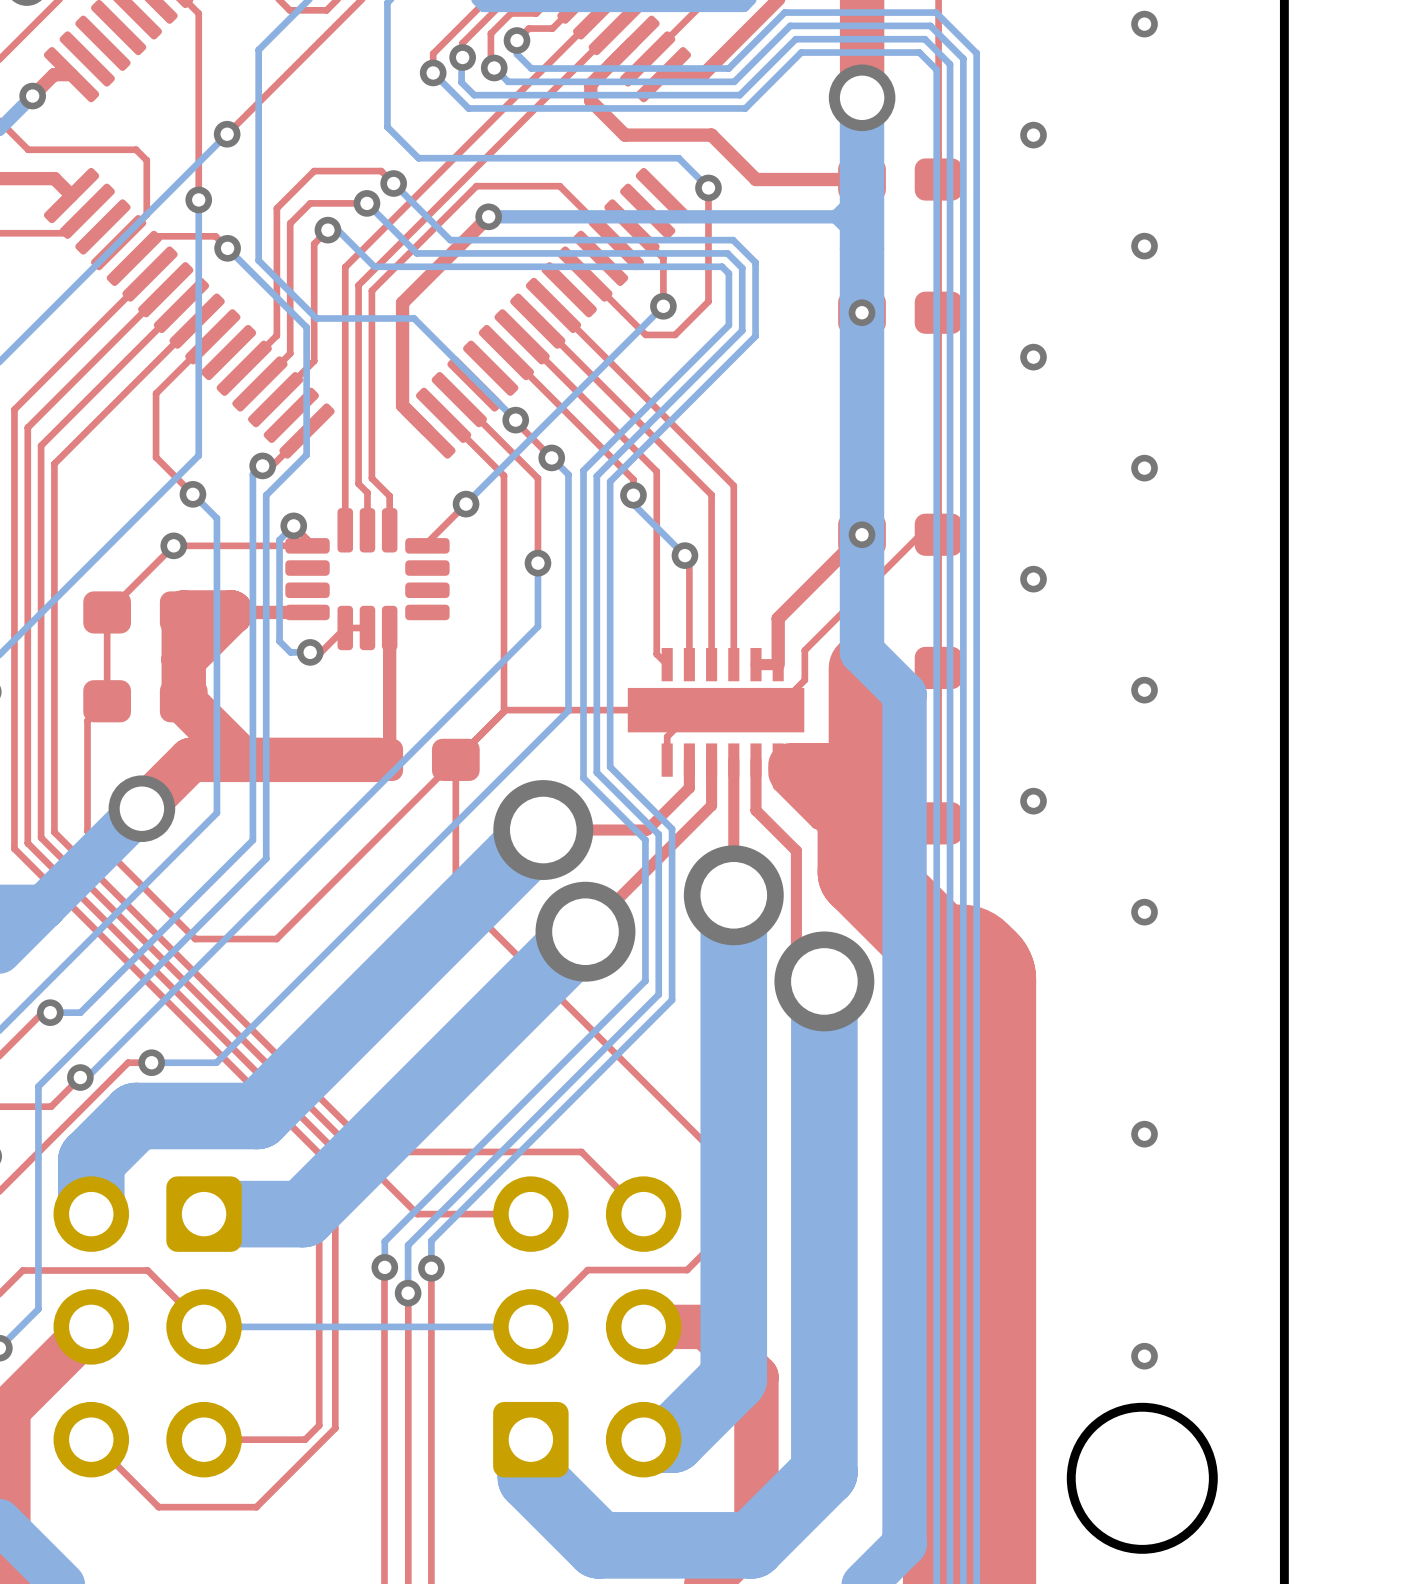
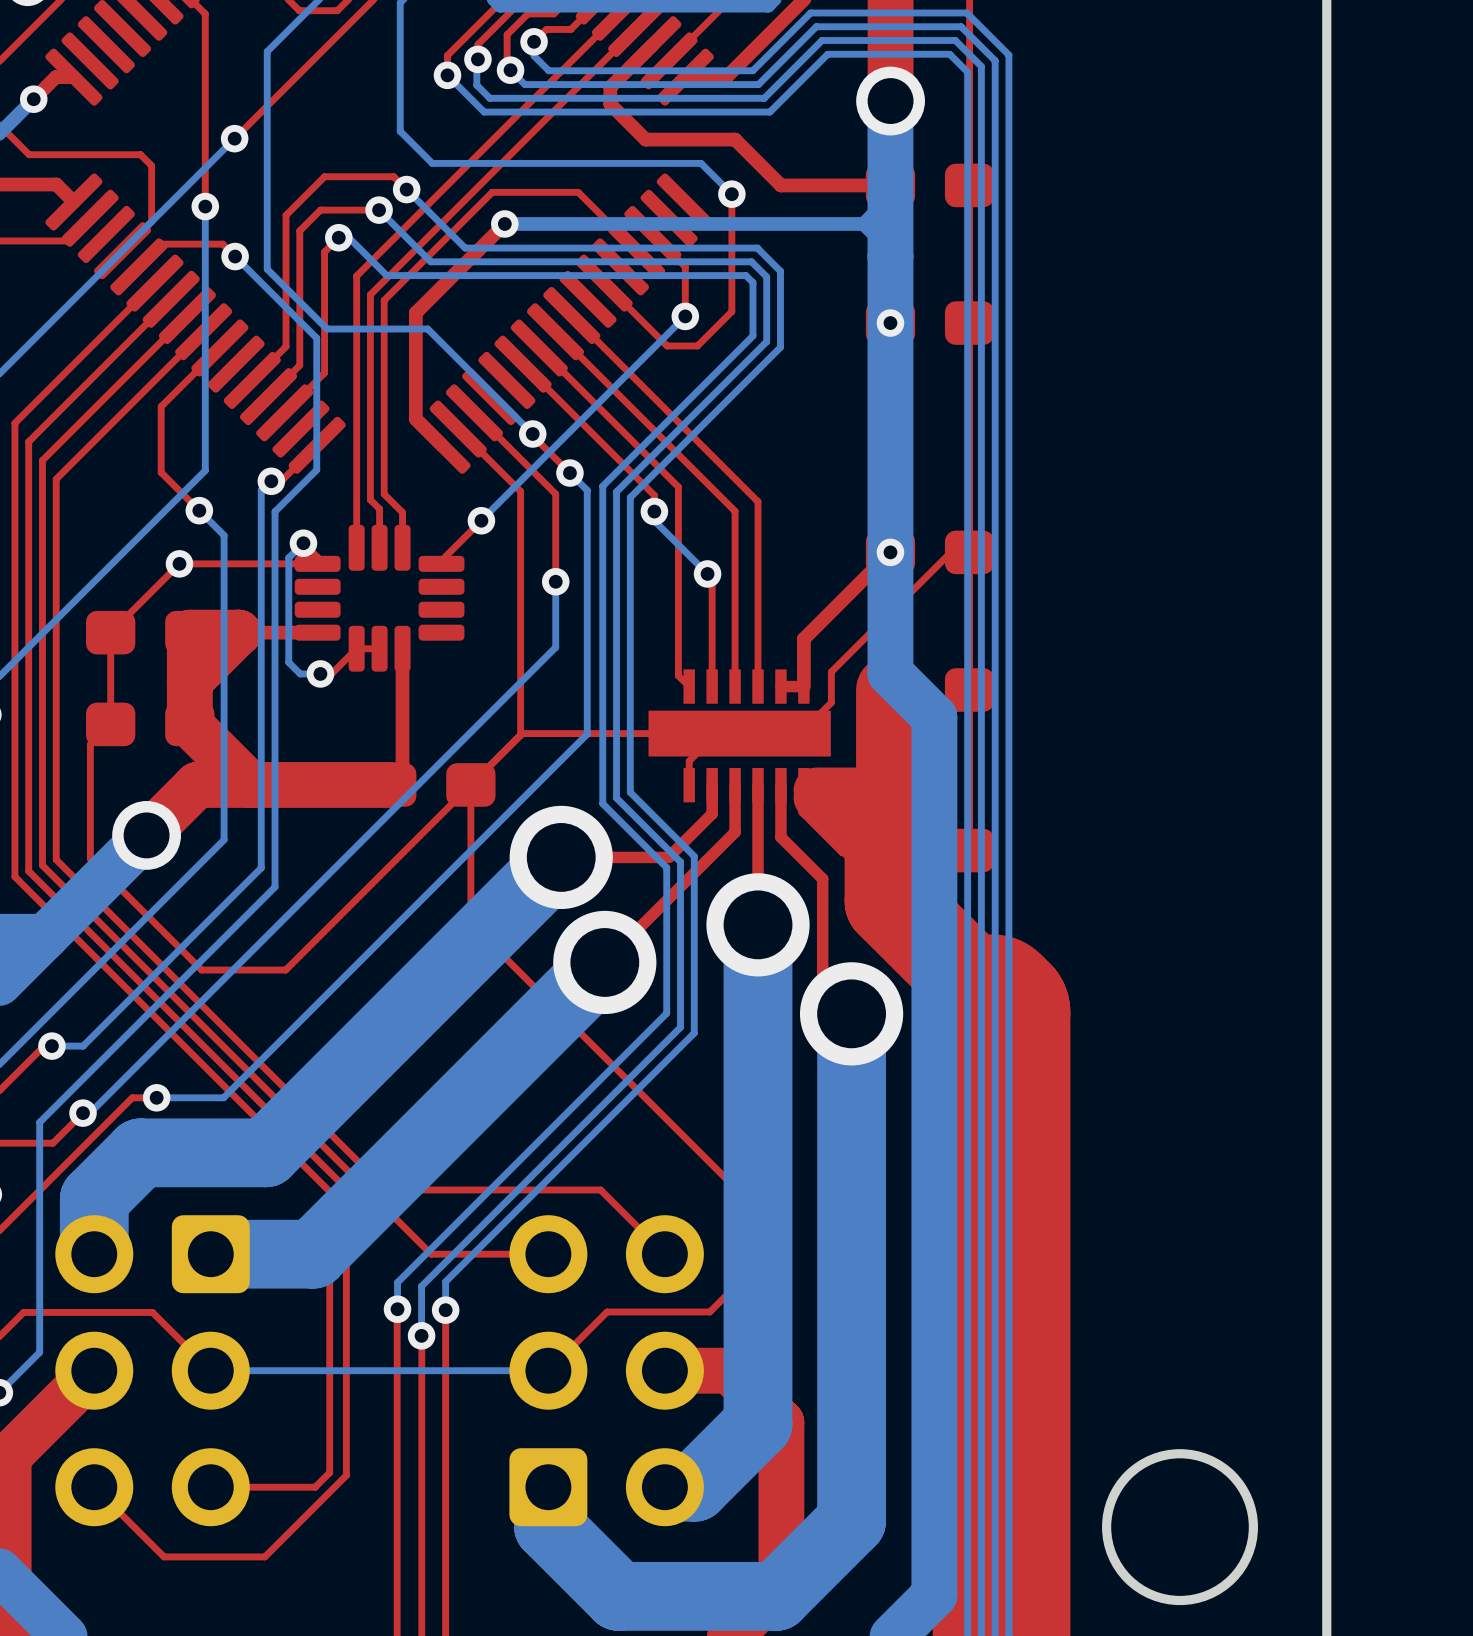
via: (1144, 24) -> none
via: (1033, 135) -> none
via: (1144, 246) -> none
via: (1033, 357) -> none
via: (1144, 468) -> none
via: (1033, 579) -> none
via: (1144, 690) -> none
via: (1033, 801) -> none
via: (1144, 912) -> none
via: (1144, 1134) -> none
via: (1144, 1356) -> none

